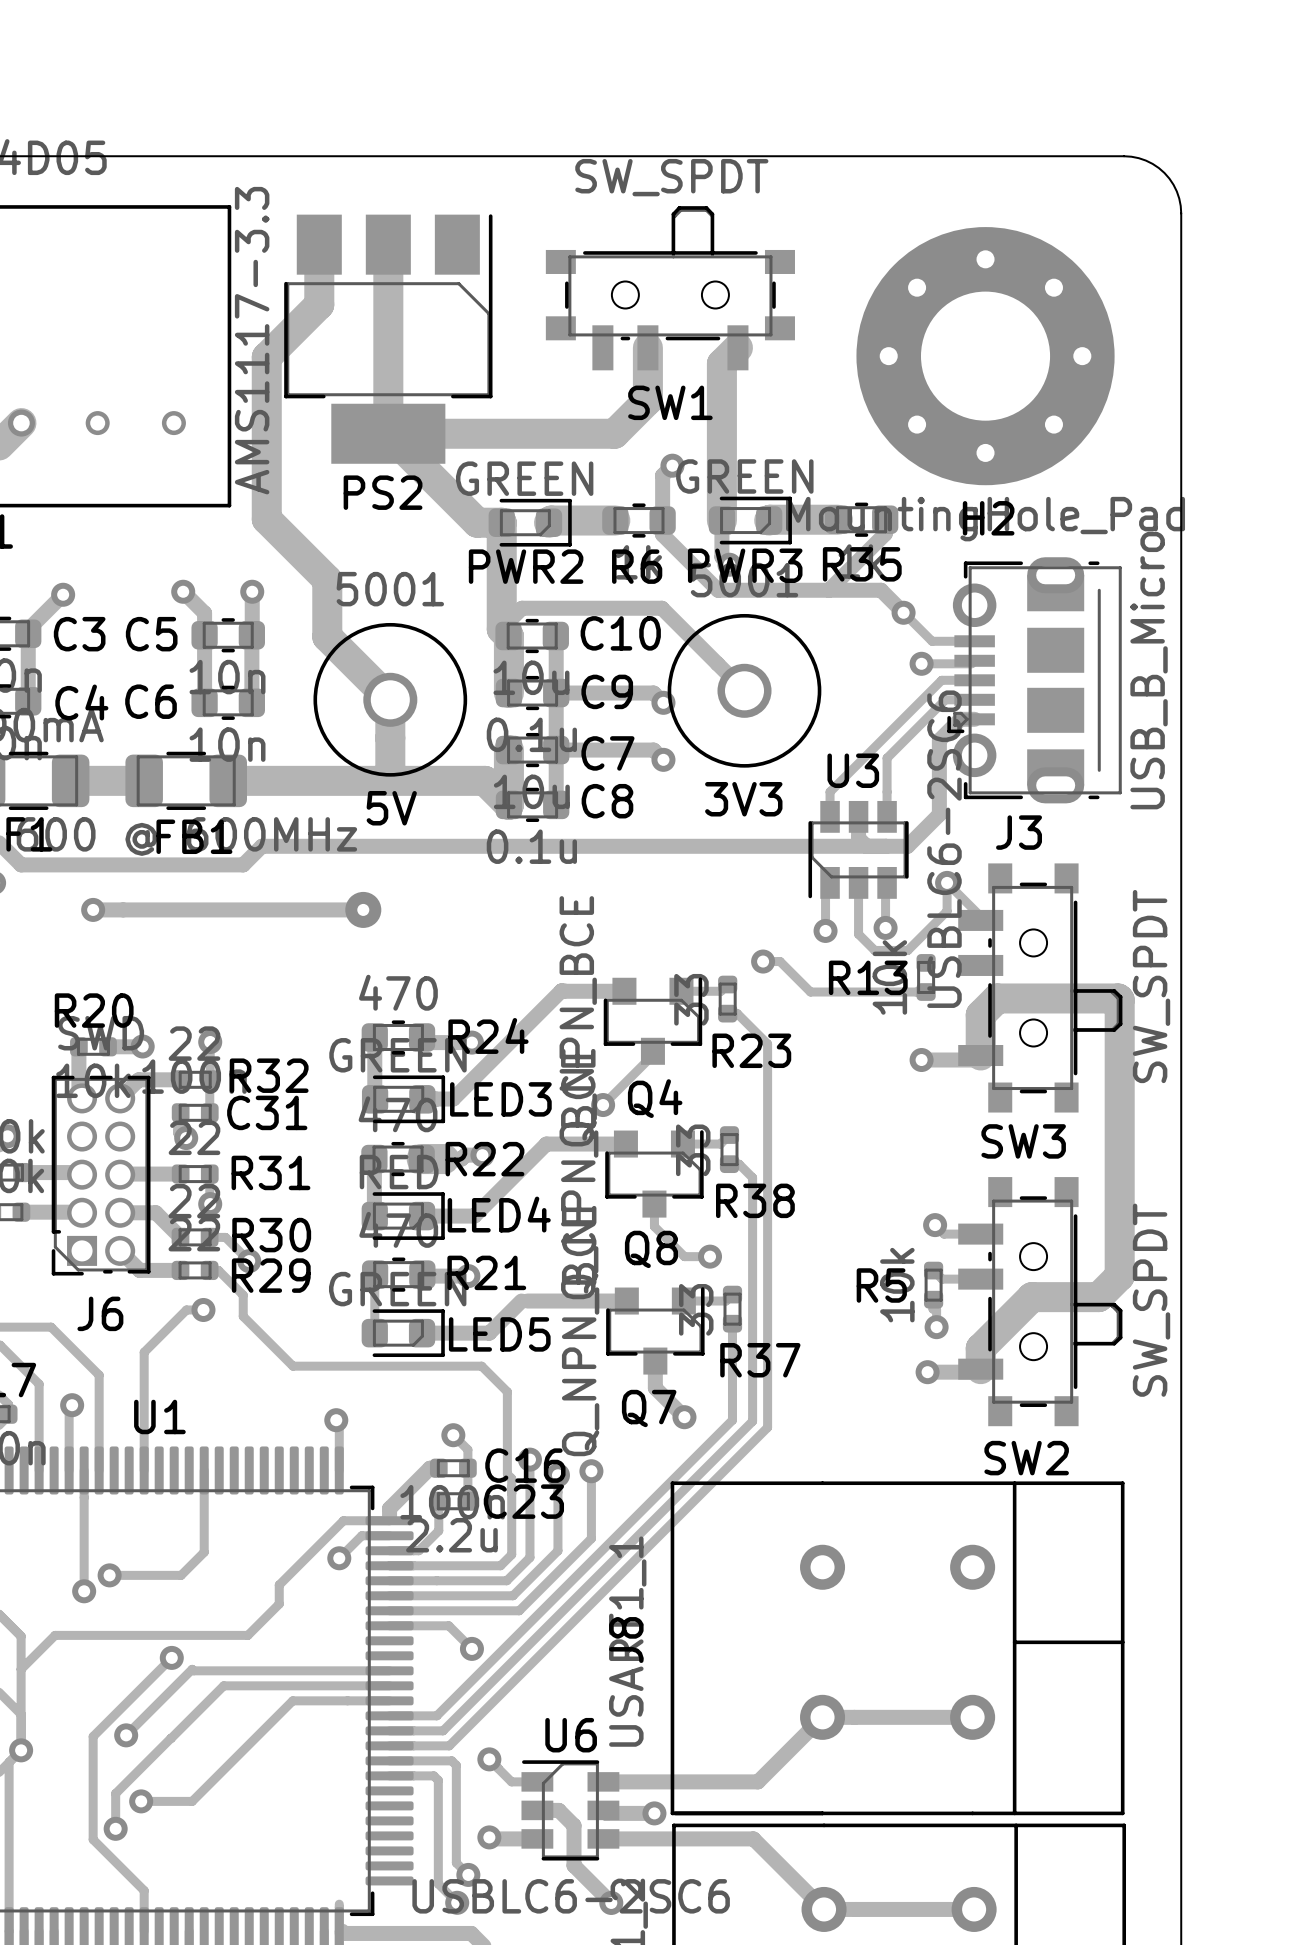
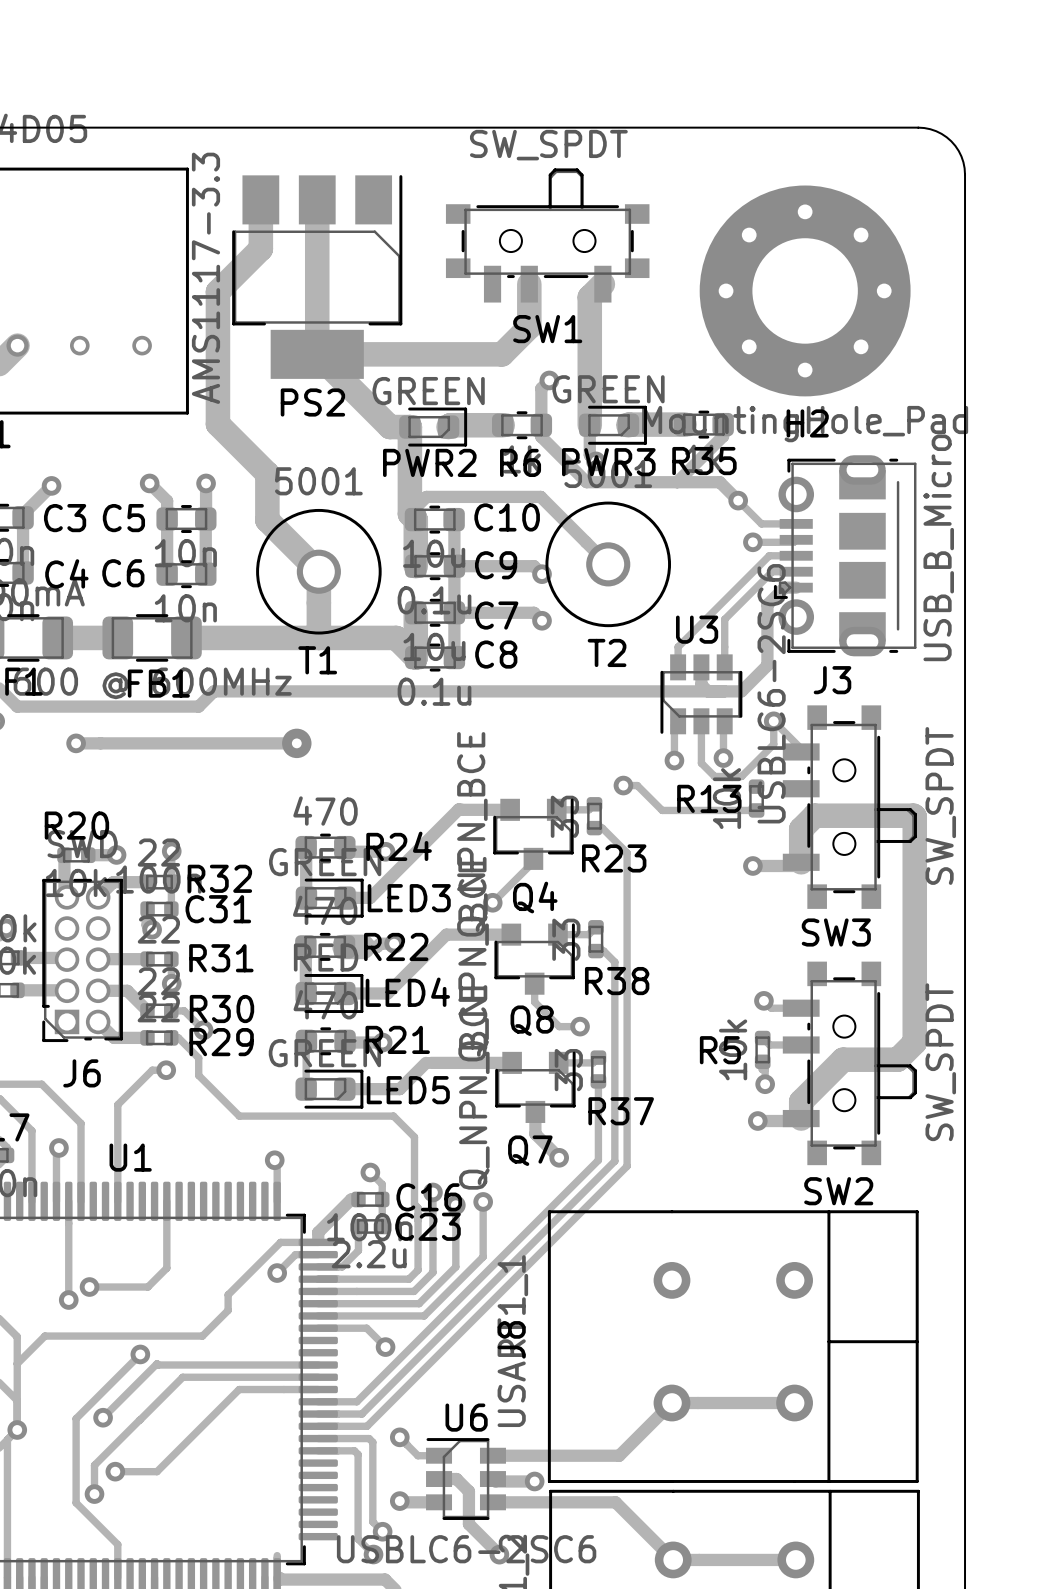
3V3 name: 3V3 (743, 799) -> T2 (607, 652)
5V name: 5V (391, 808) -> T1 (317, 660)

